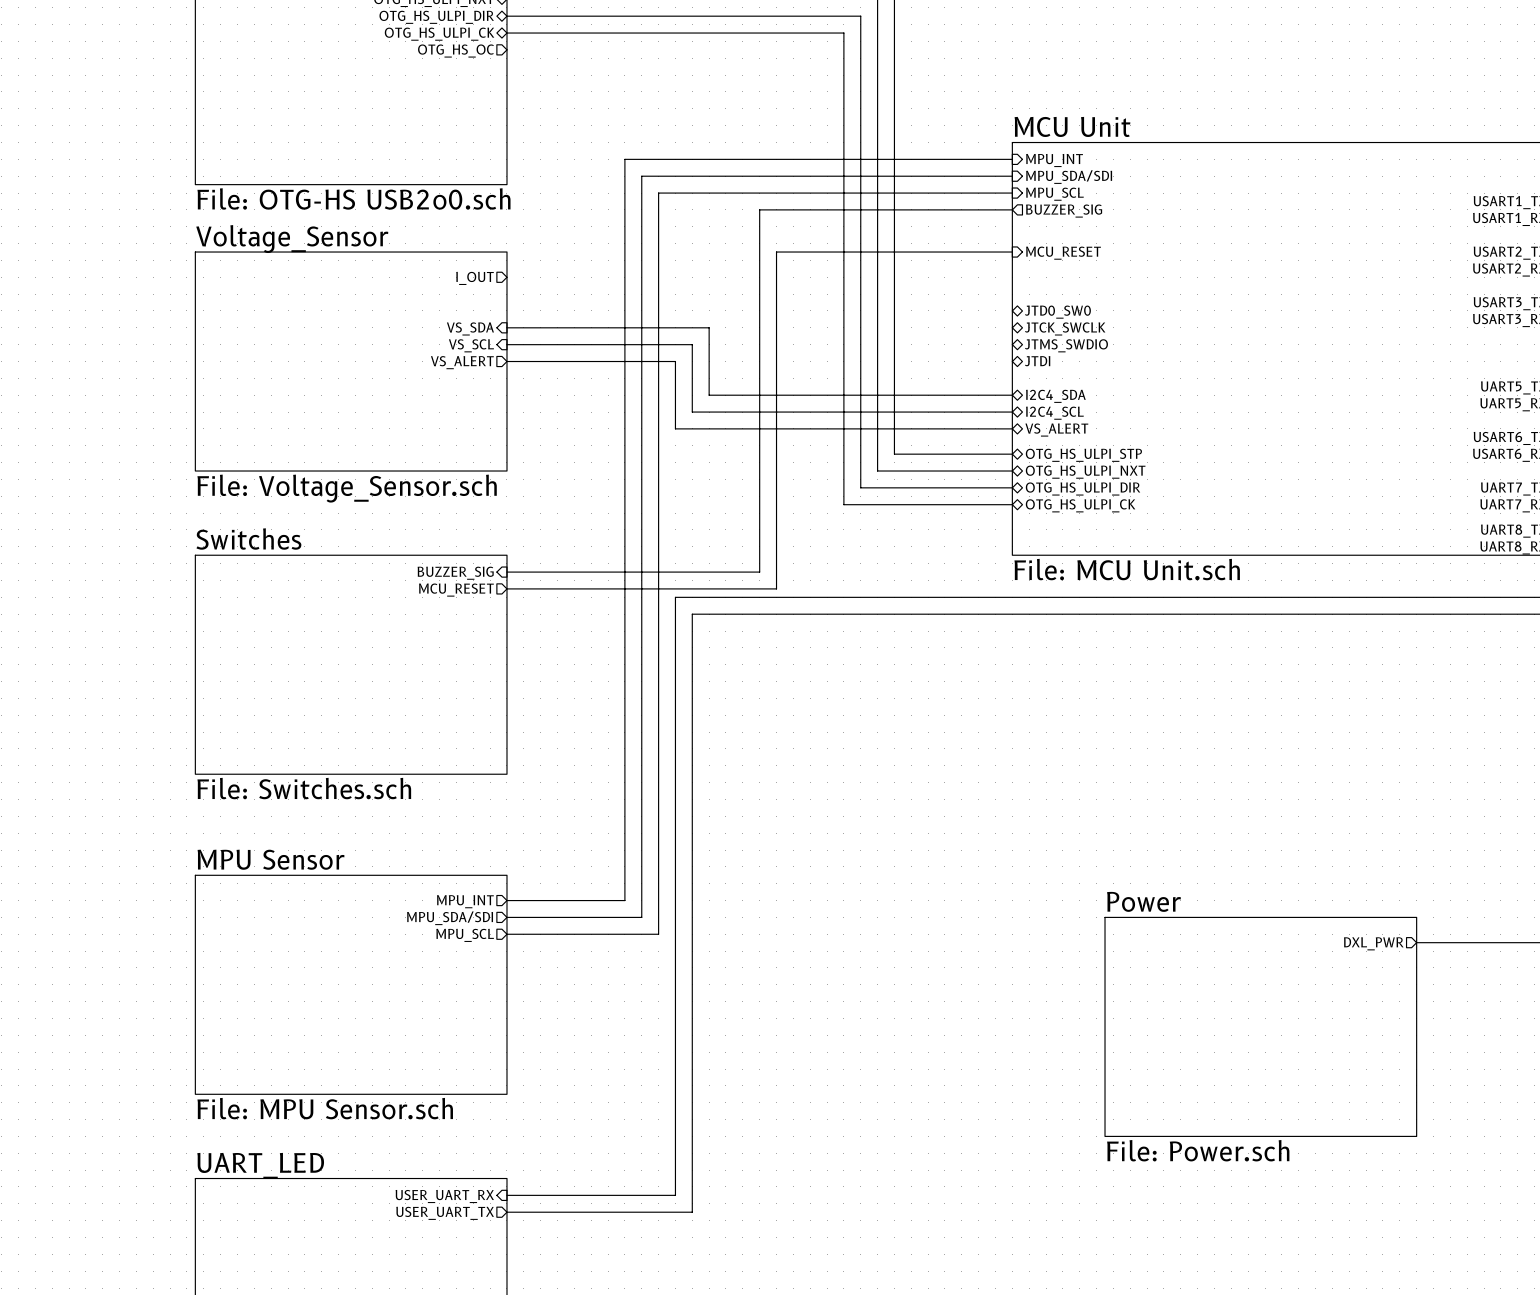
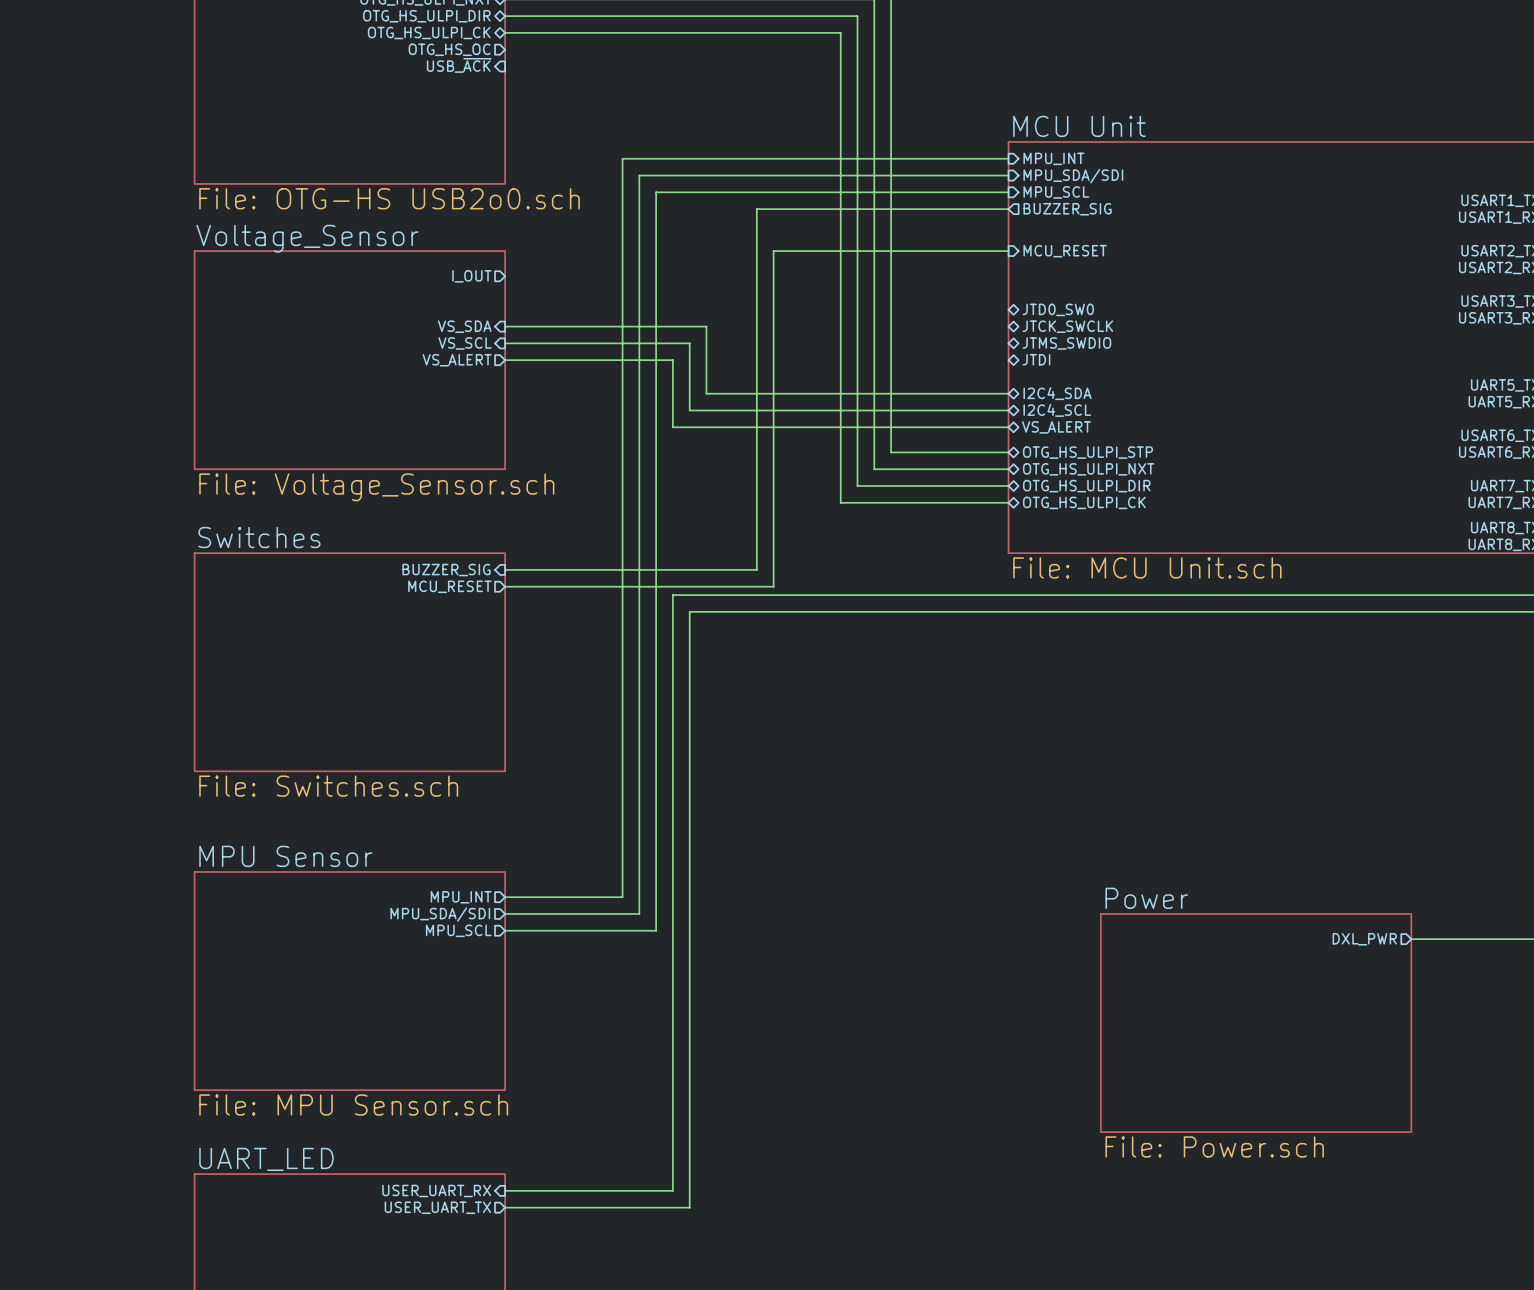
sheet pin: none -> USB_~{ACK} (459, 65)

